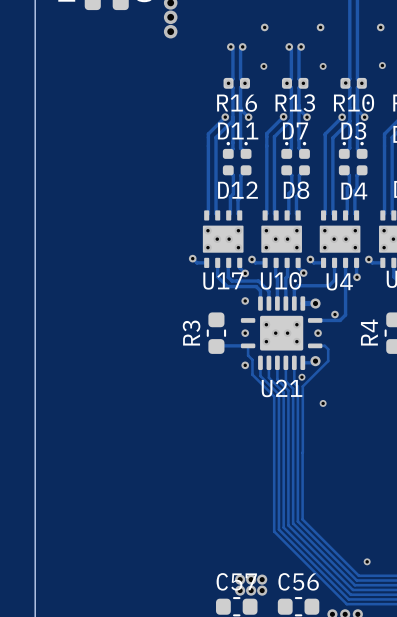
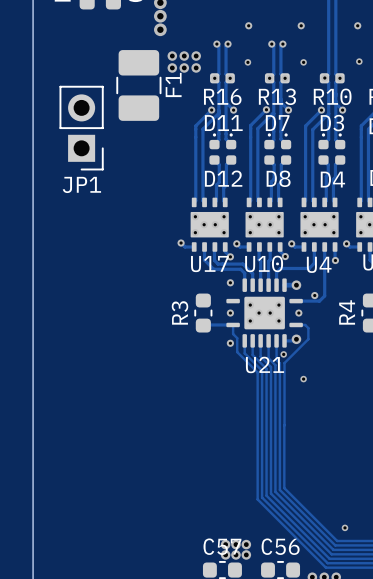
via: none -> (172, 56)
via: none -> (184, 56)
via: none -> (196, 56)
via: none -> (172, 67)
via: none -> (184, 67)
via: none -> (196, 67)
F1: none -> (138, 85)
JP1: none -> (81, 128)

